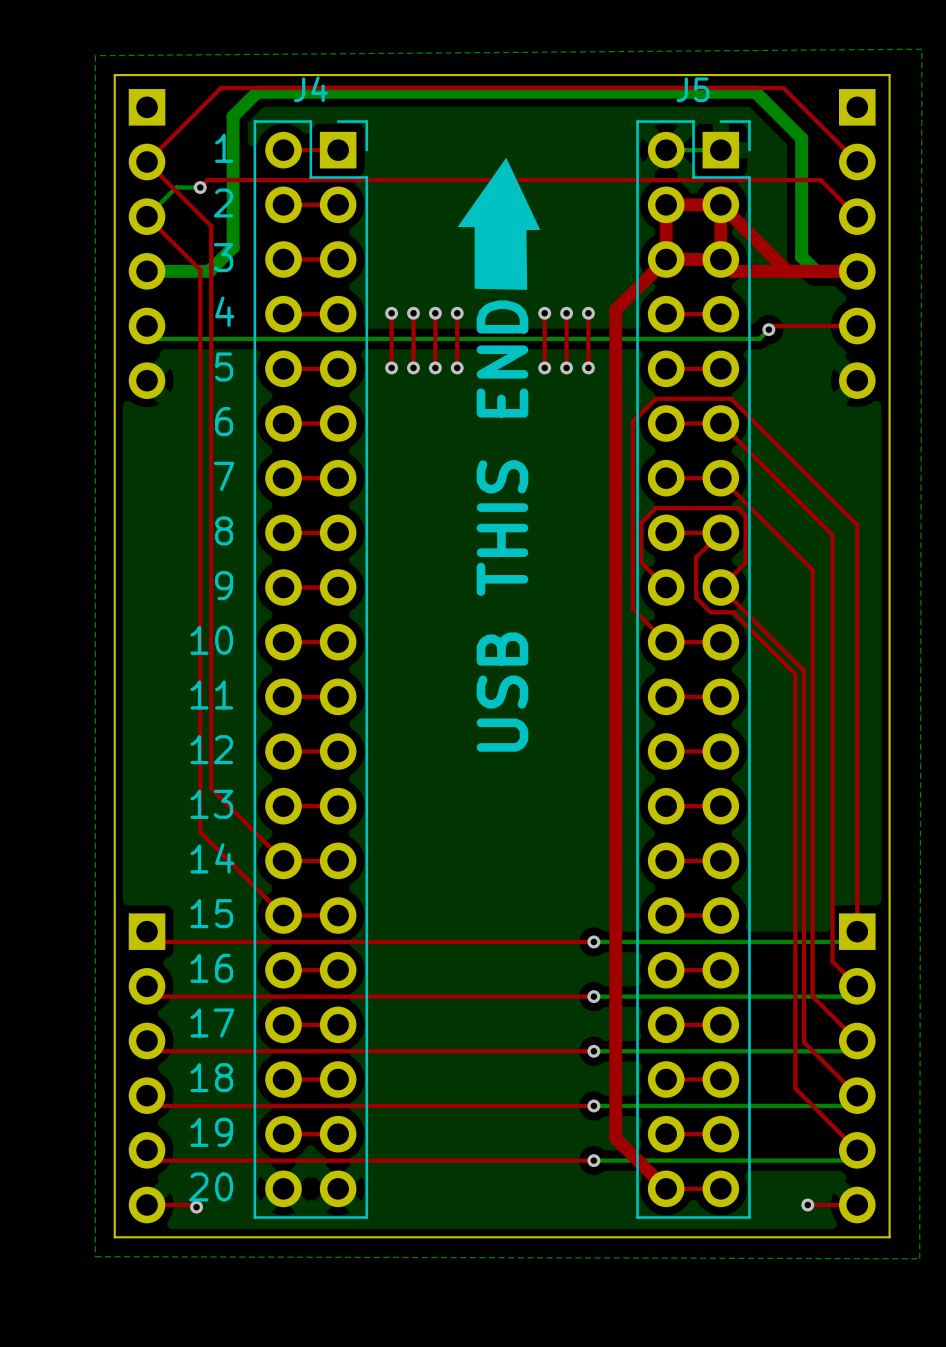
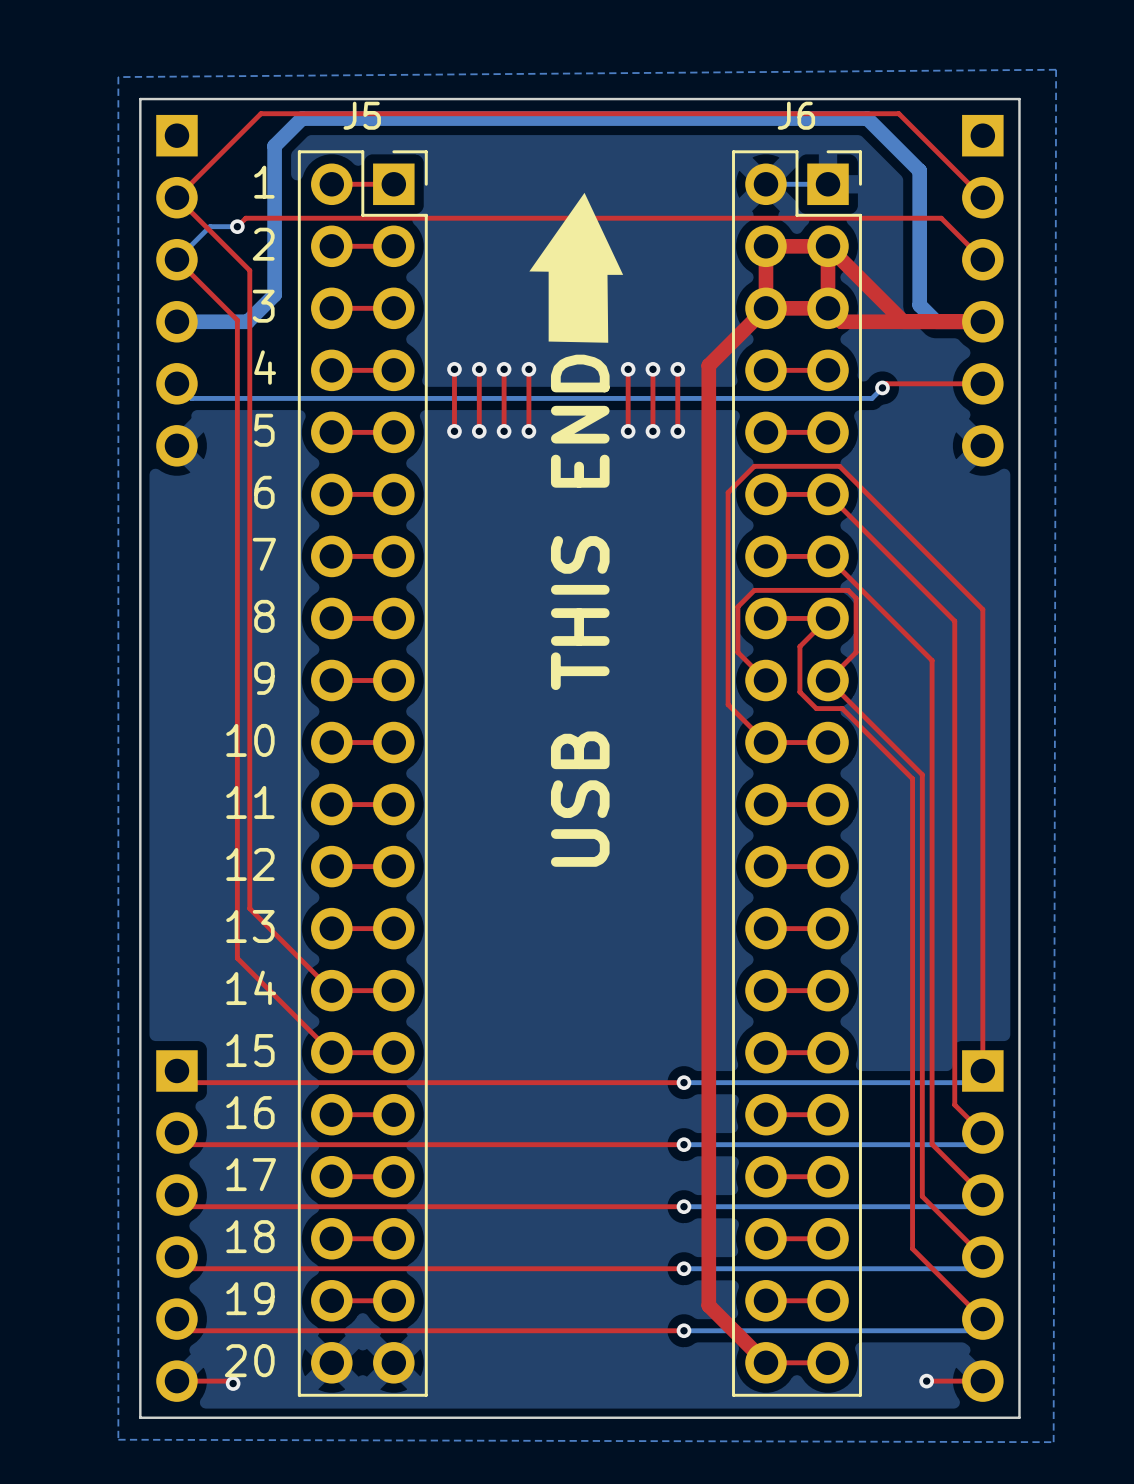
J4 name: J4 (310, 89) -> J5 (362, 115)
J5 name: J5 (692, 89) -> J6 (796, 115)

